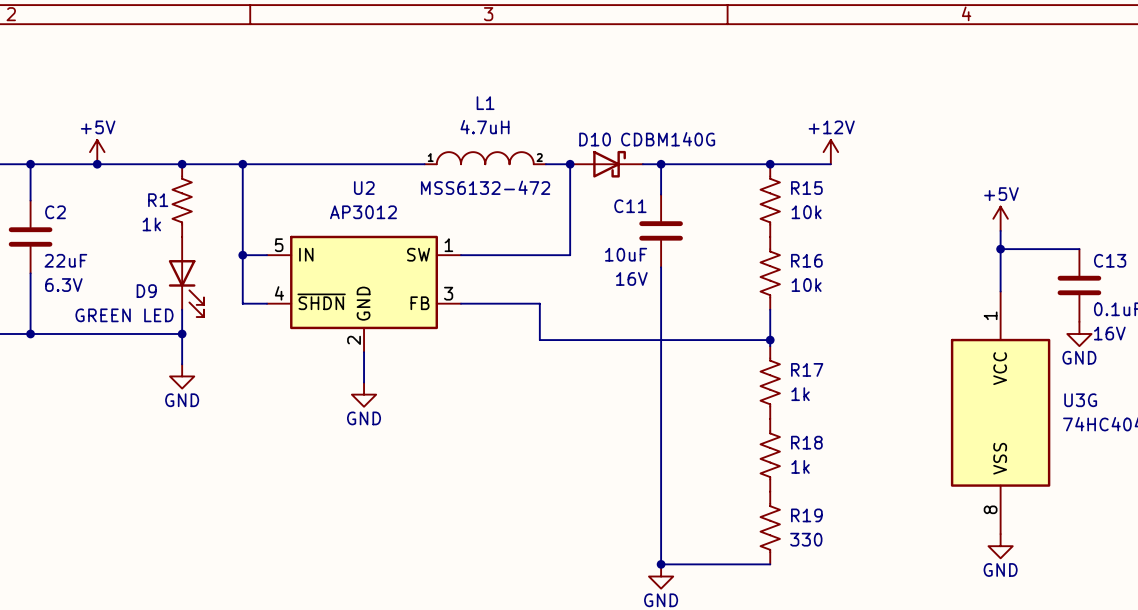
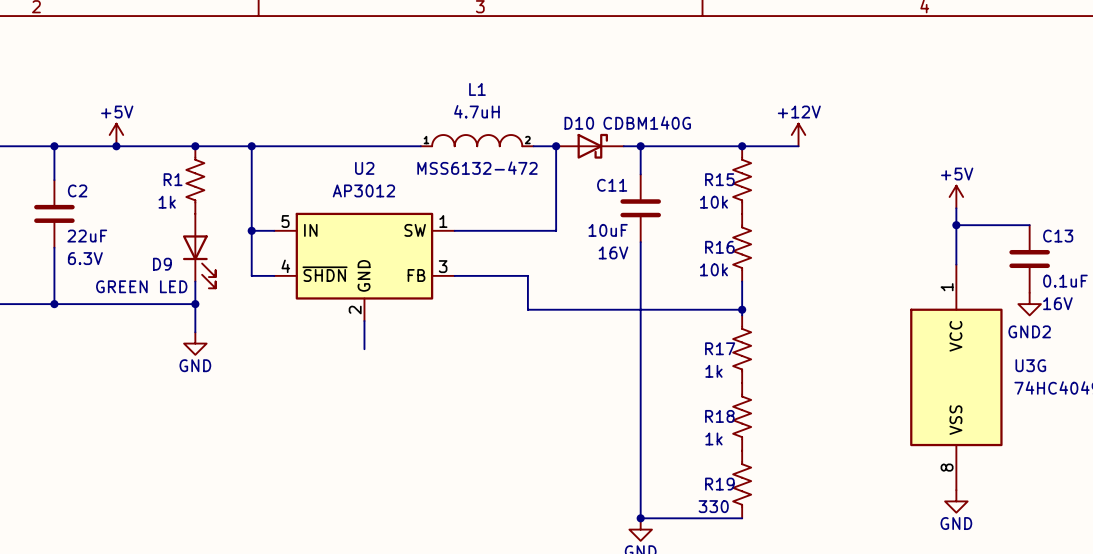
R15 name position: R15 (806, 188) -> R15 (719, 179)
R15 value position: 10k (806, 212) -> 10k (713, 202)
R16 name position: R16 (806, 260) -> R16 (719, 247)
R16 value position: 10k (806, 285) -> 10k (713, 269)
power symbol: GND (1079, 333) -> GND2 (1029, 304)
R17 name position: R17 (807, 369) -> R17 (720, 348)
power symbol: GND (364, 394) -> none
R17 value position: 1k (800, 394) -> 1k (713, 371)
R18 name position: R18 (806, 442) -> R18 (719, 416)
R18 value position: 1k (800, 466) -> 1k (713, 438)
R19 name position: R19 (806, 515) -> R19 (719, 484)
R19 value position: 330 (806, 539) -> 330 (713, 506)

